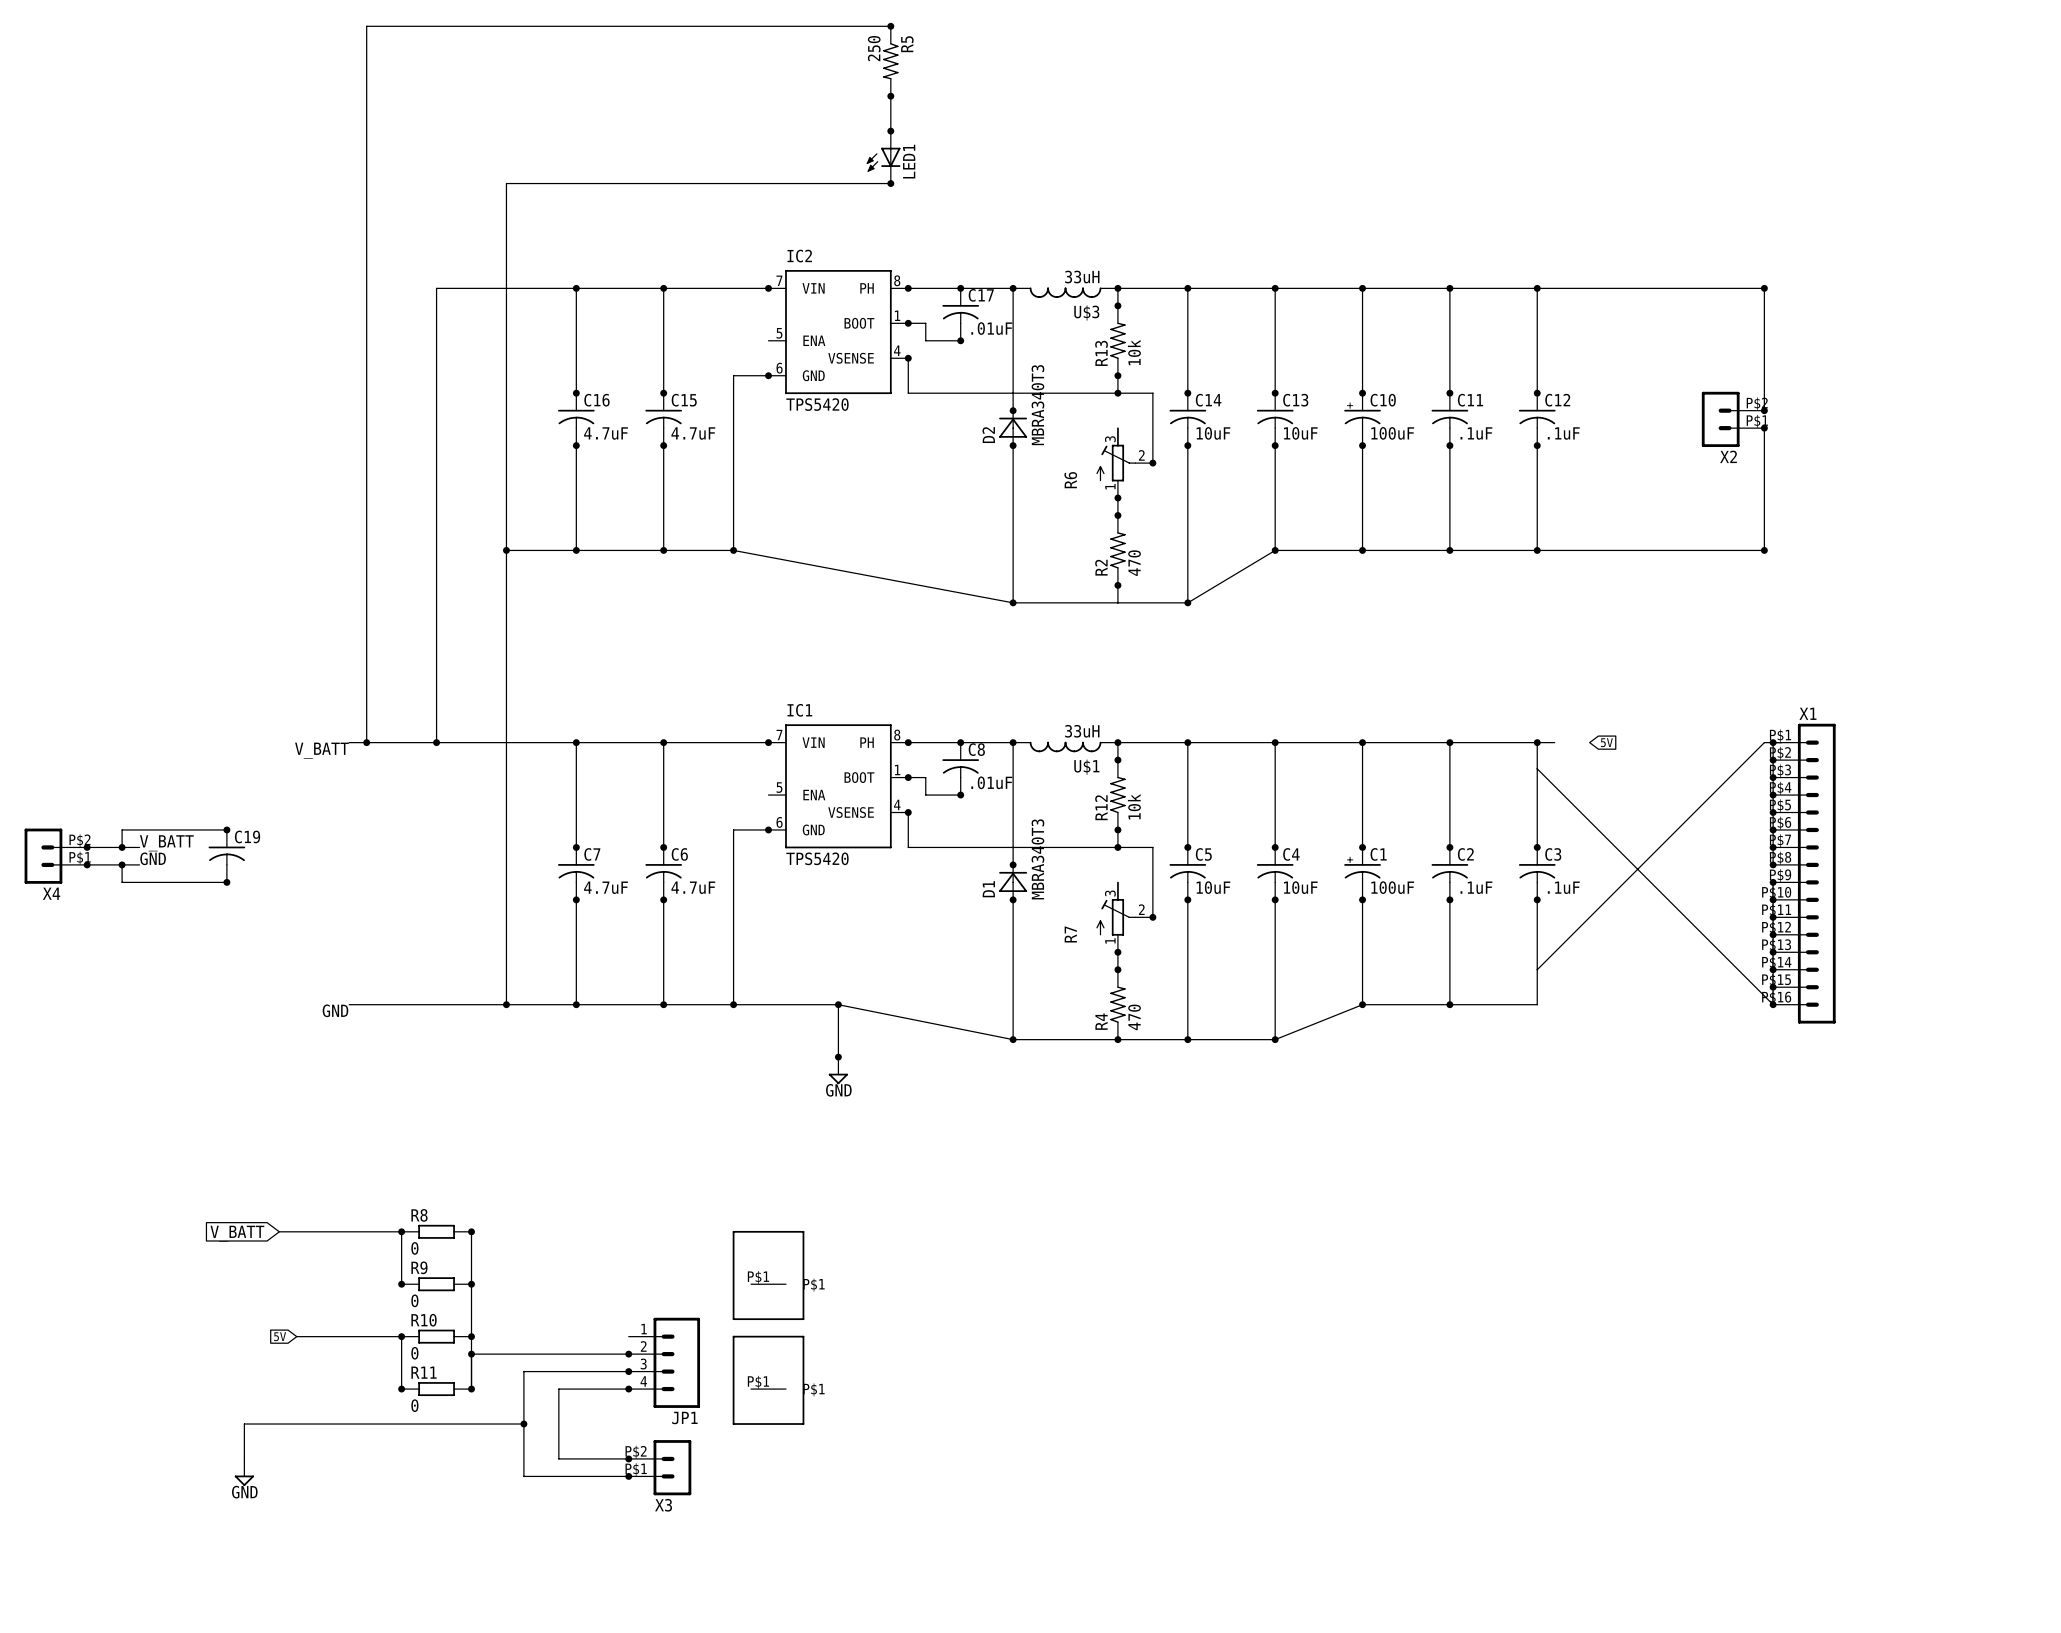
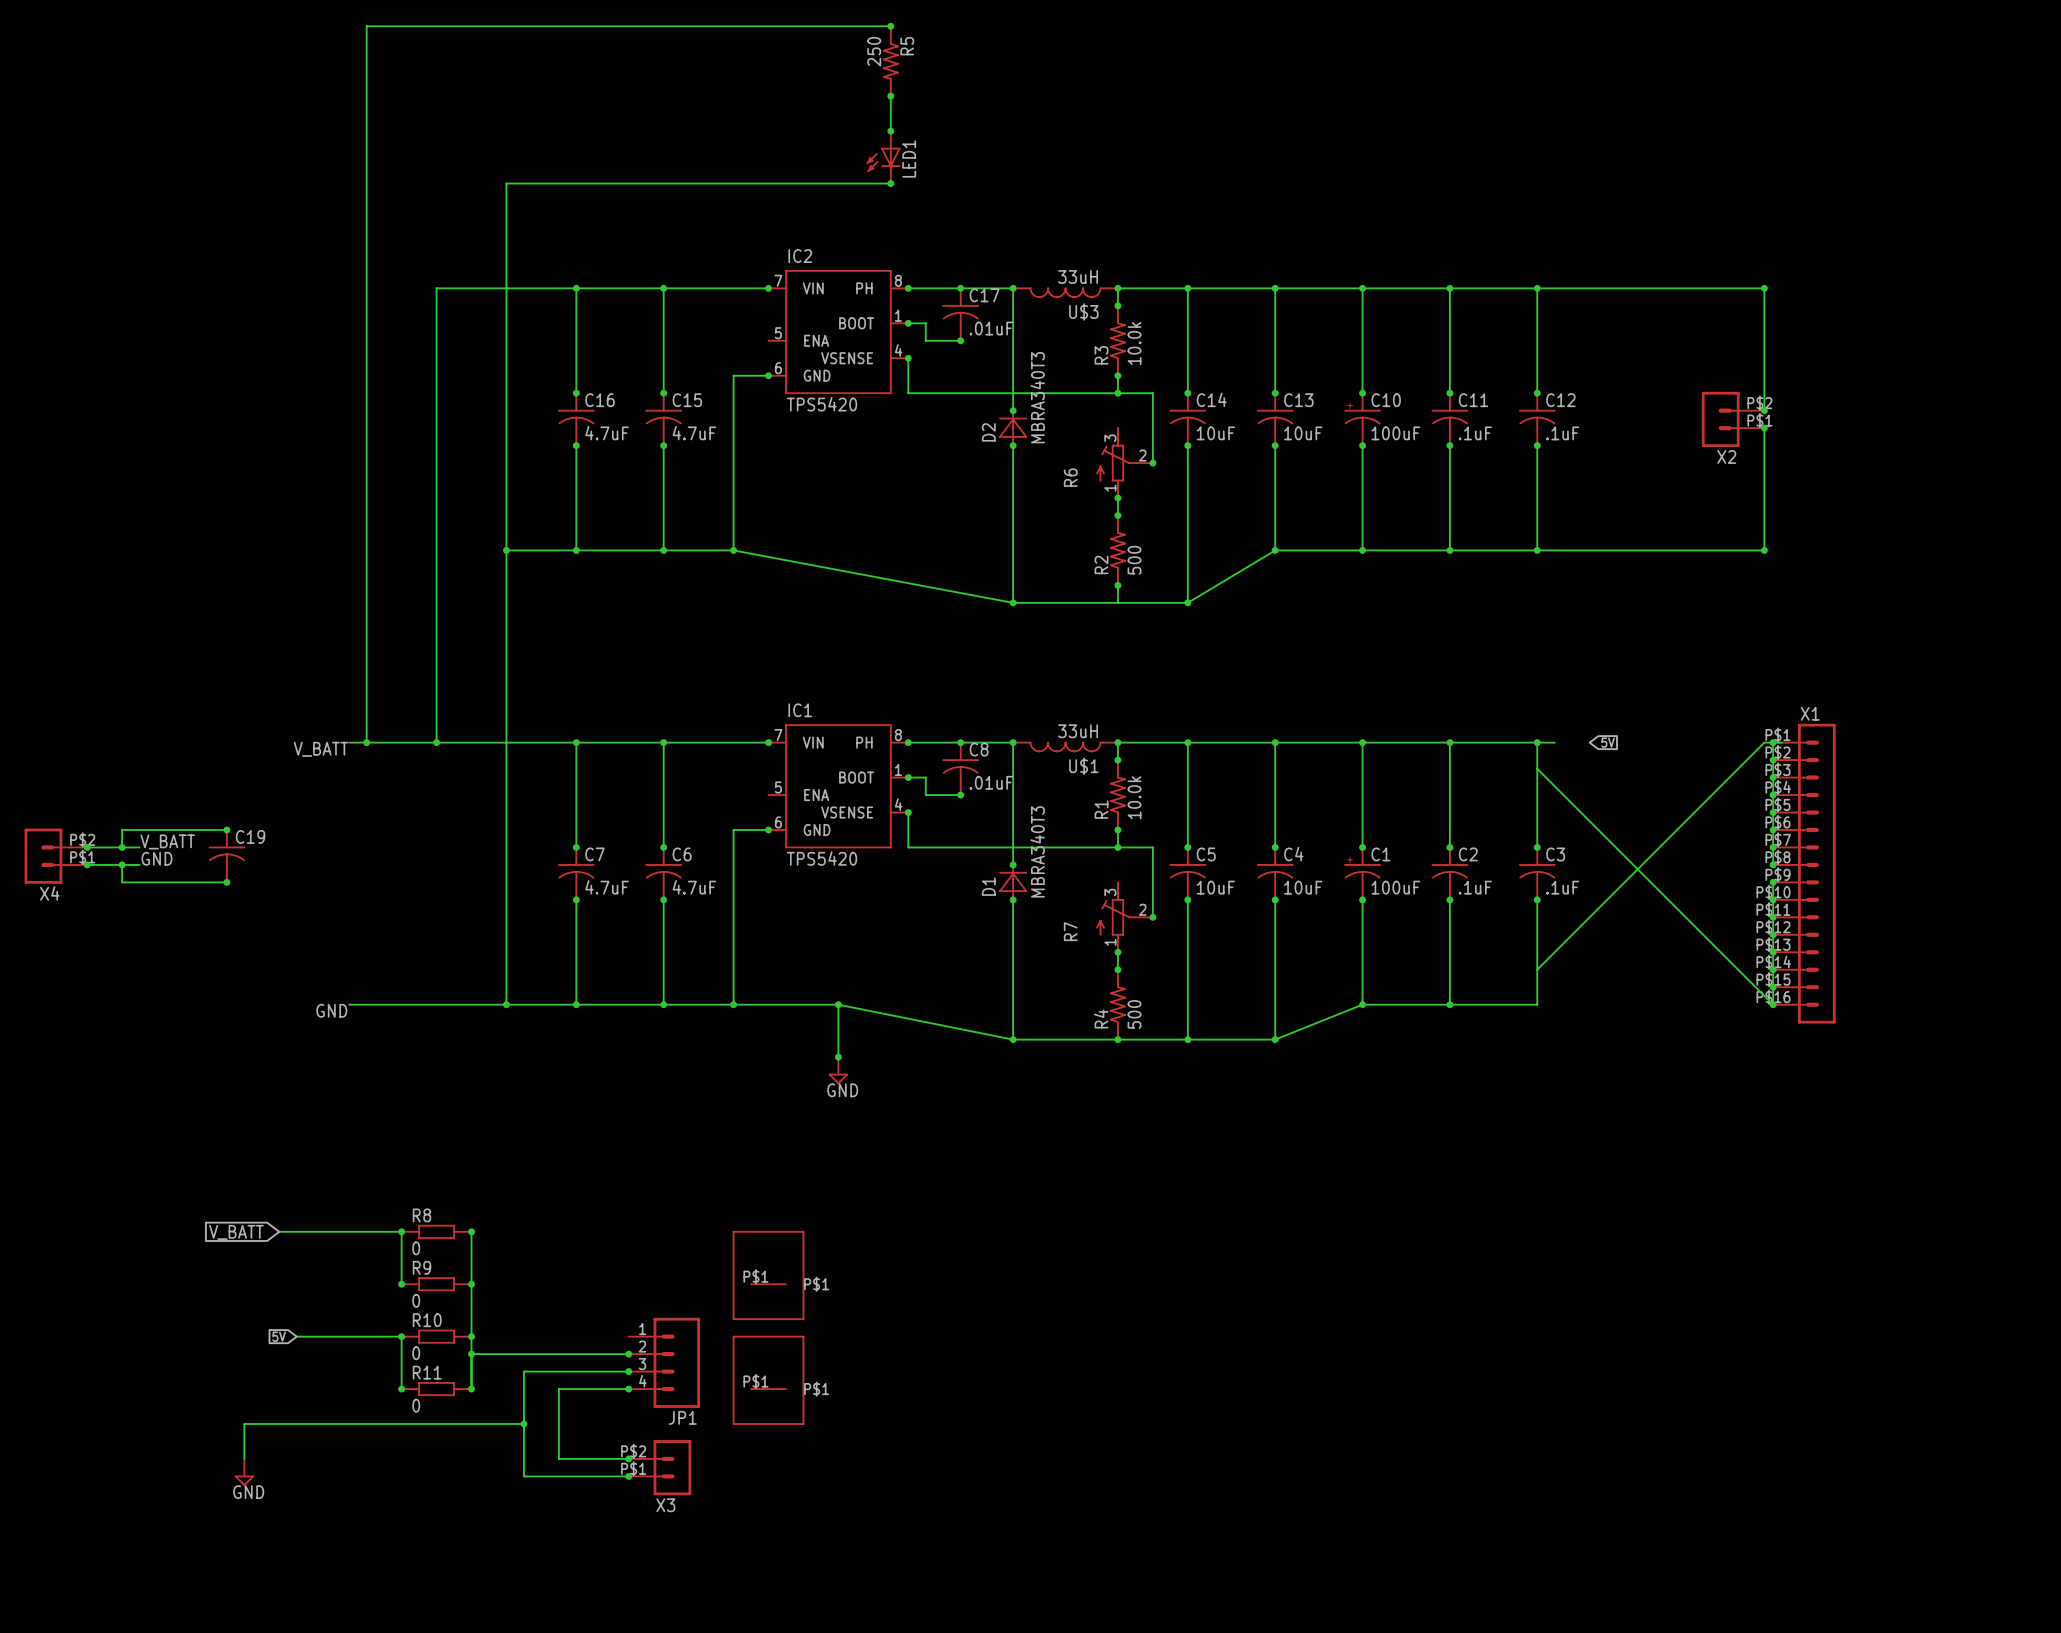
R13 value: 10k (1134, 352) -> 10.0k (1134, 343)
R13 name: R13 (1101, 353) -> R3 (1101, 355)
R2 value: 470 (1134, 563) -> 500 (1134, 560)
R12 value: 10k (1134, 806) -> 10.0k (1134, 797)
R12 name: R12 (1101, 807) -> R1 (1101, 809)
R4 value: 470 (1134, 1017) -> 500 (1134, 1014)

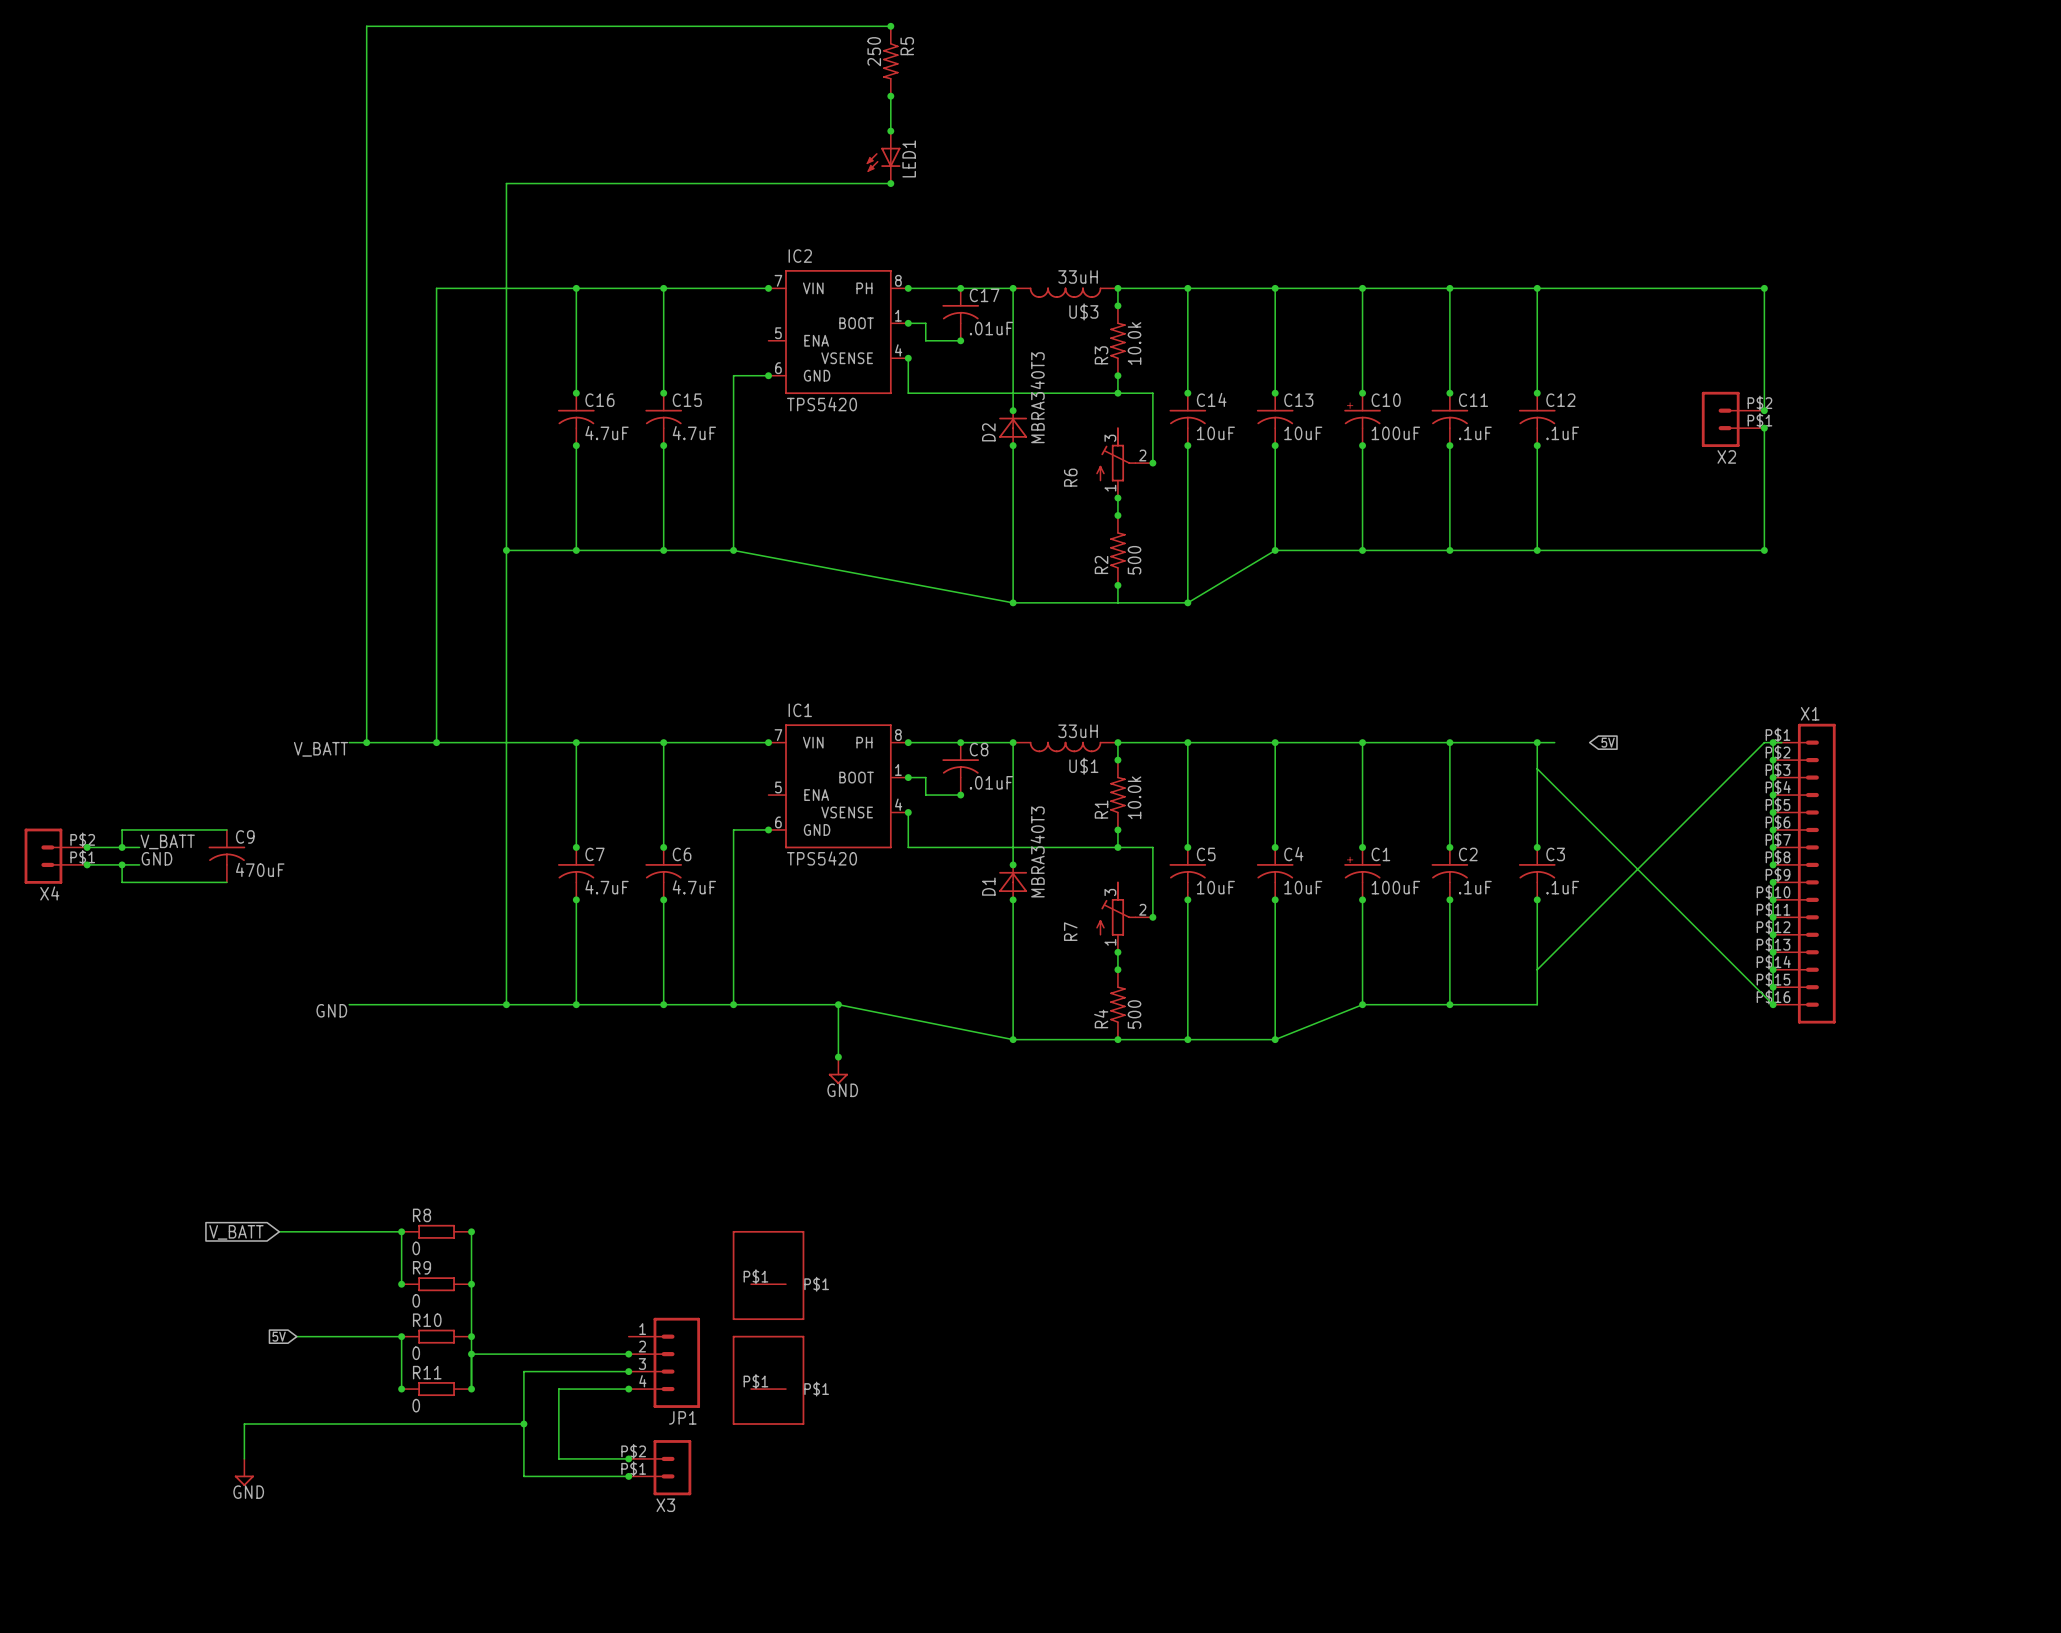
junction: (226, 829) -> none
C19 name: C19 (250, 836) -> C9 (245, 836)
C19 value: none -> 470uF (260, 869)
junction: (226, 882) -> none

